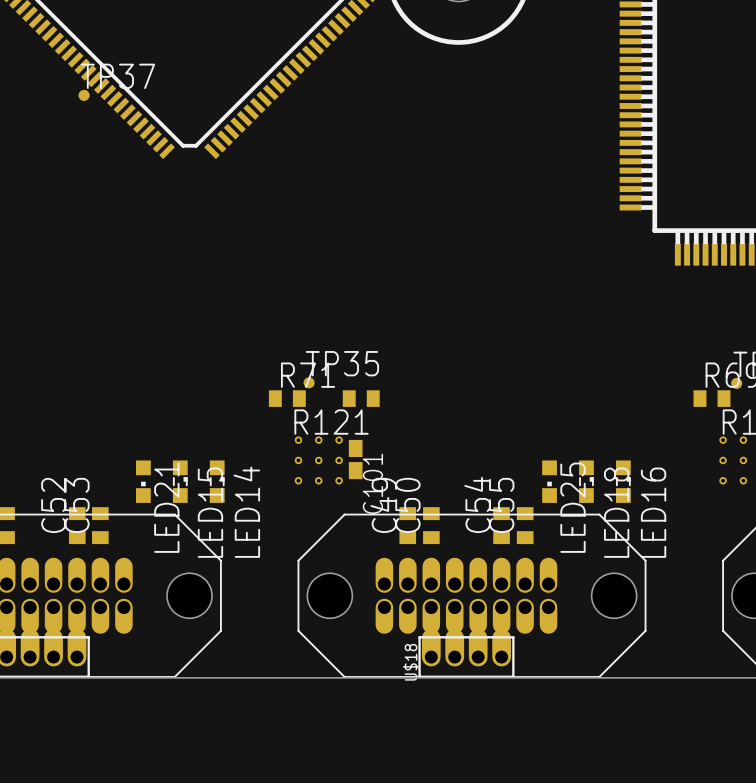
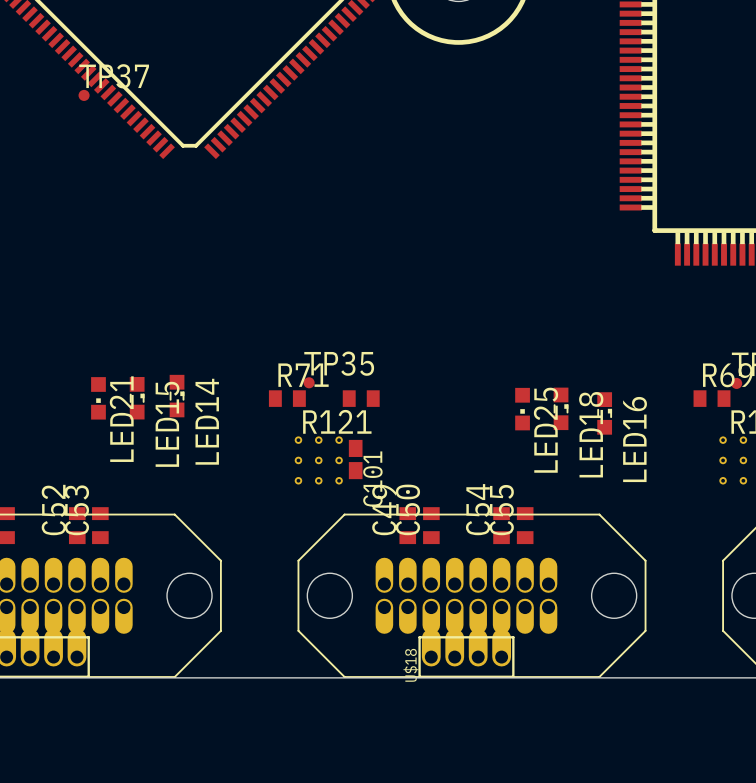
LED21 position: (143, 481) -> (98, 398)
LED15 position: (180, 481) -> (137, 398)
LED14 position: (217, 481) -> (177, 396)
LED25 position: (549, 481) -> (522, 409)
LED18 position: (586, 481) -> (561, 408)
LED16 position: (623, 481) -> (604, 413)

